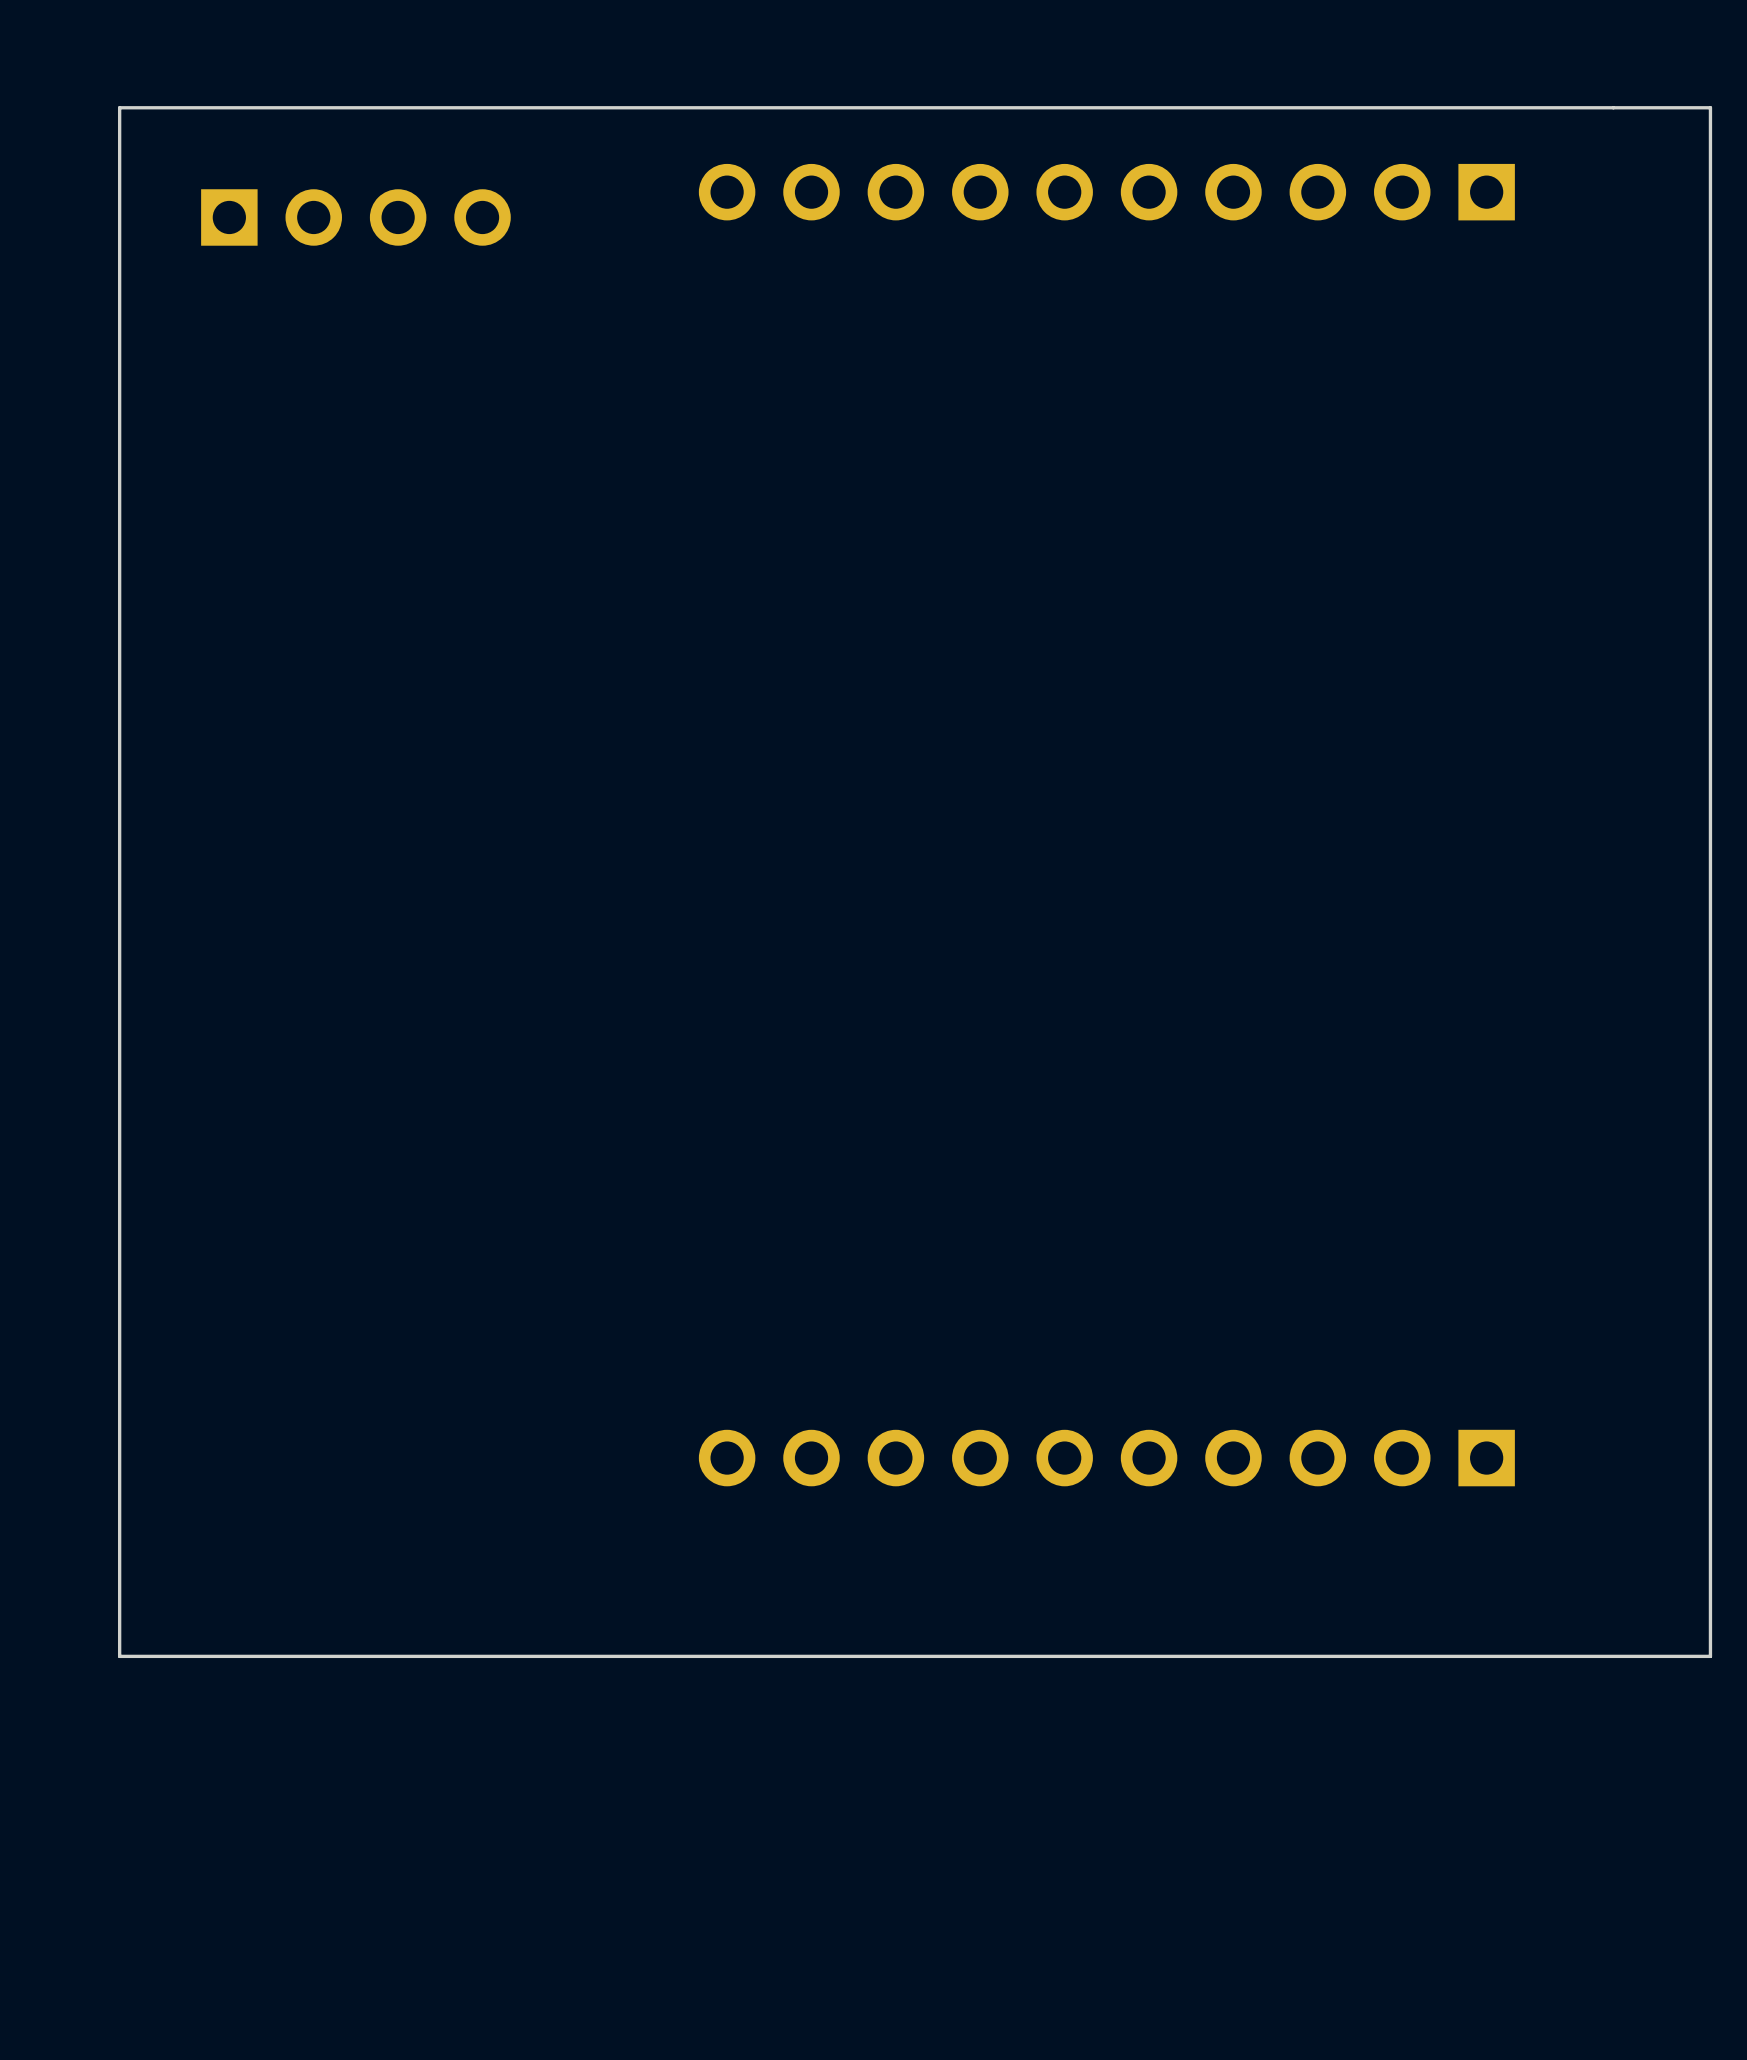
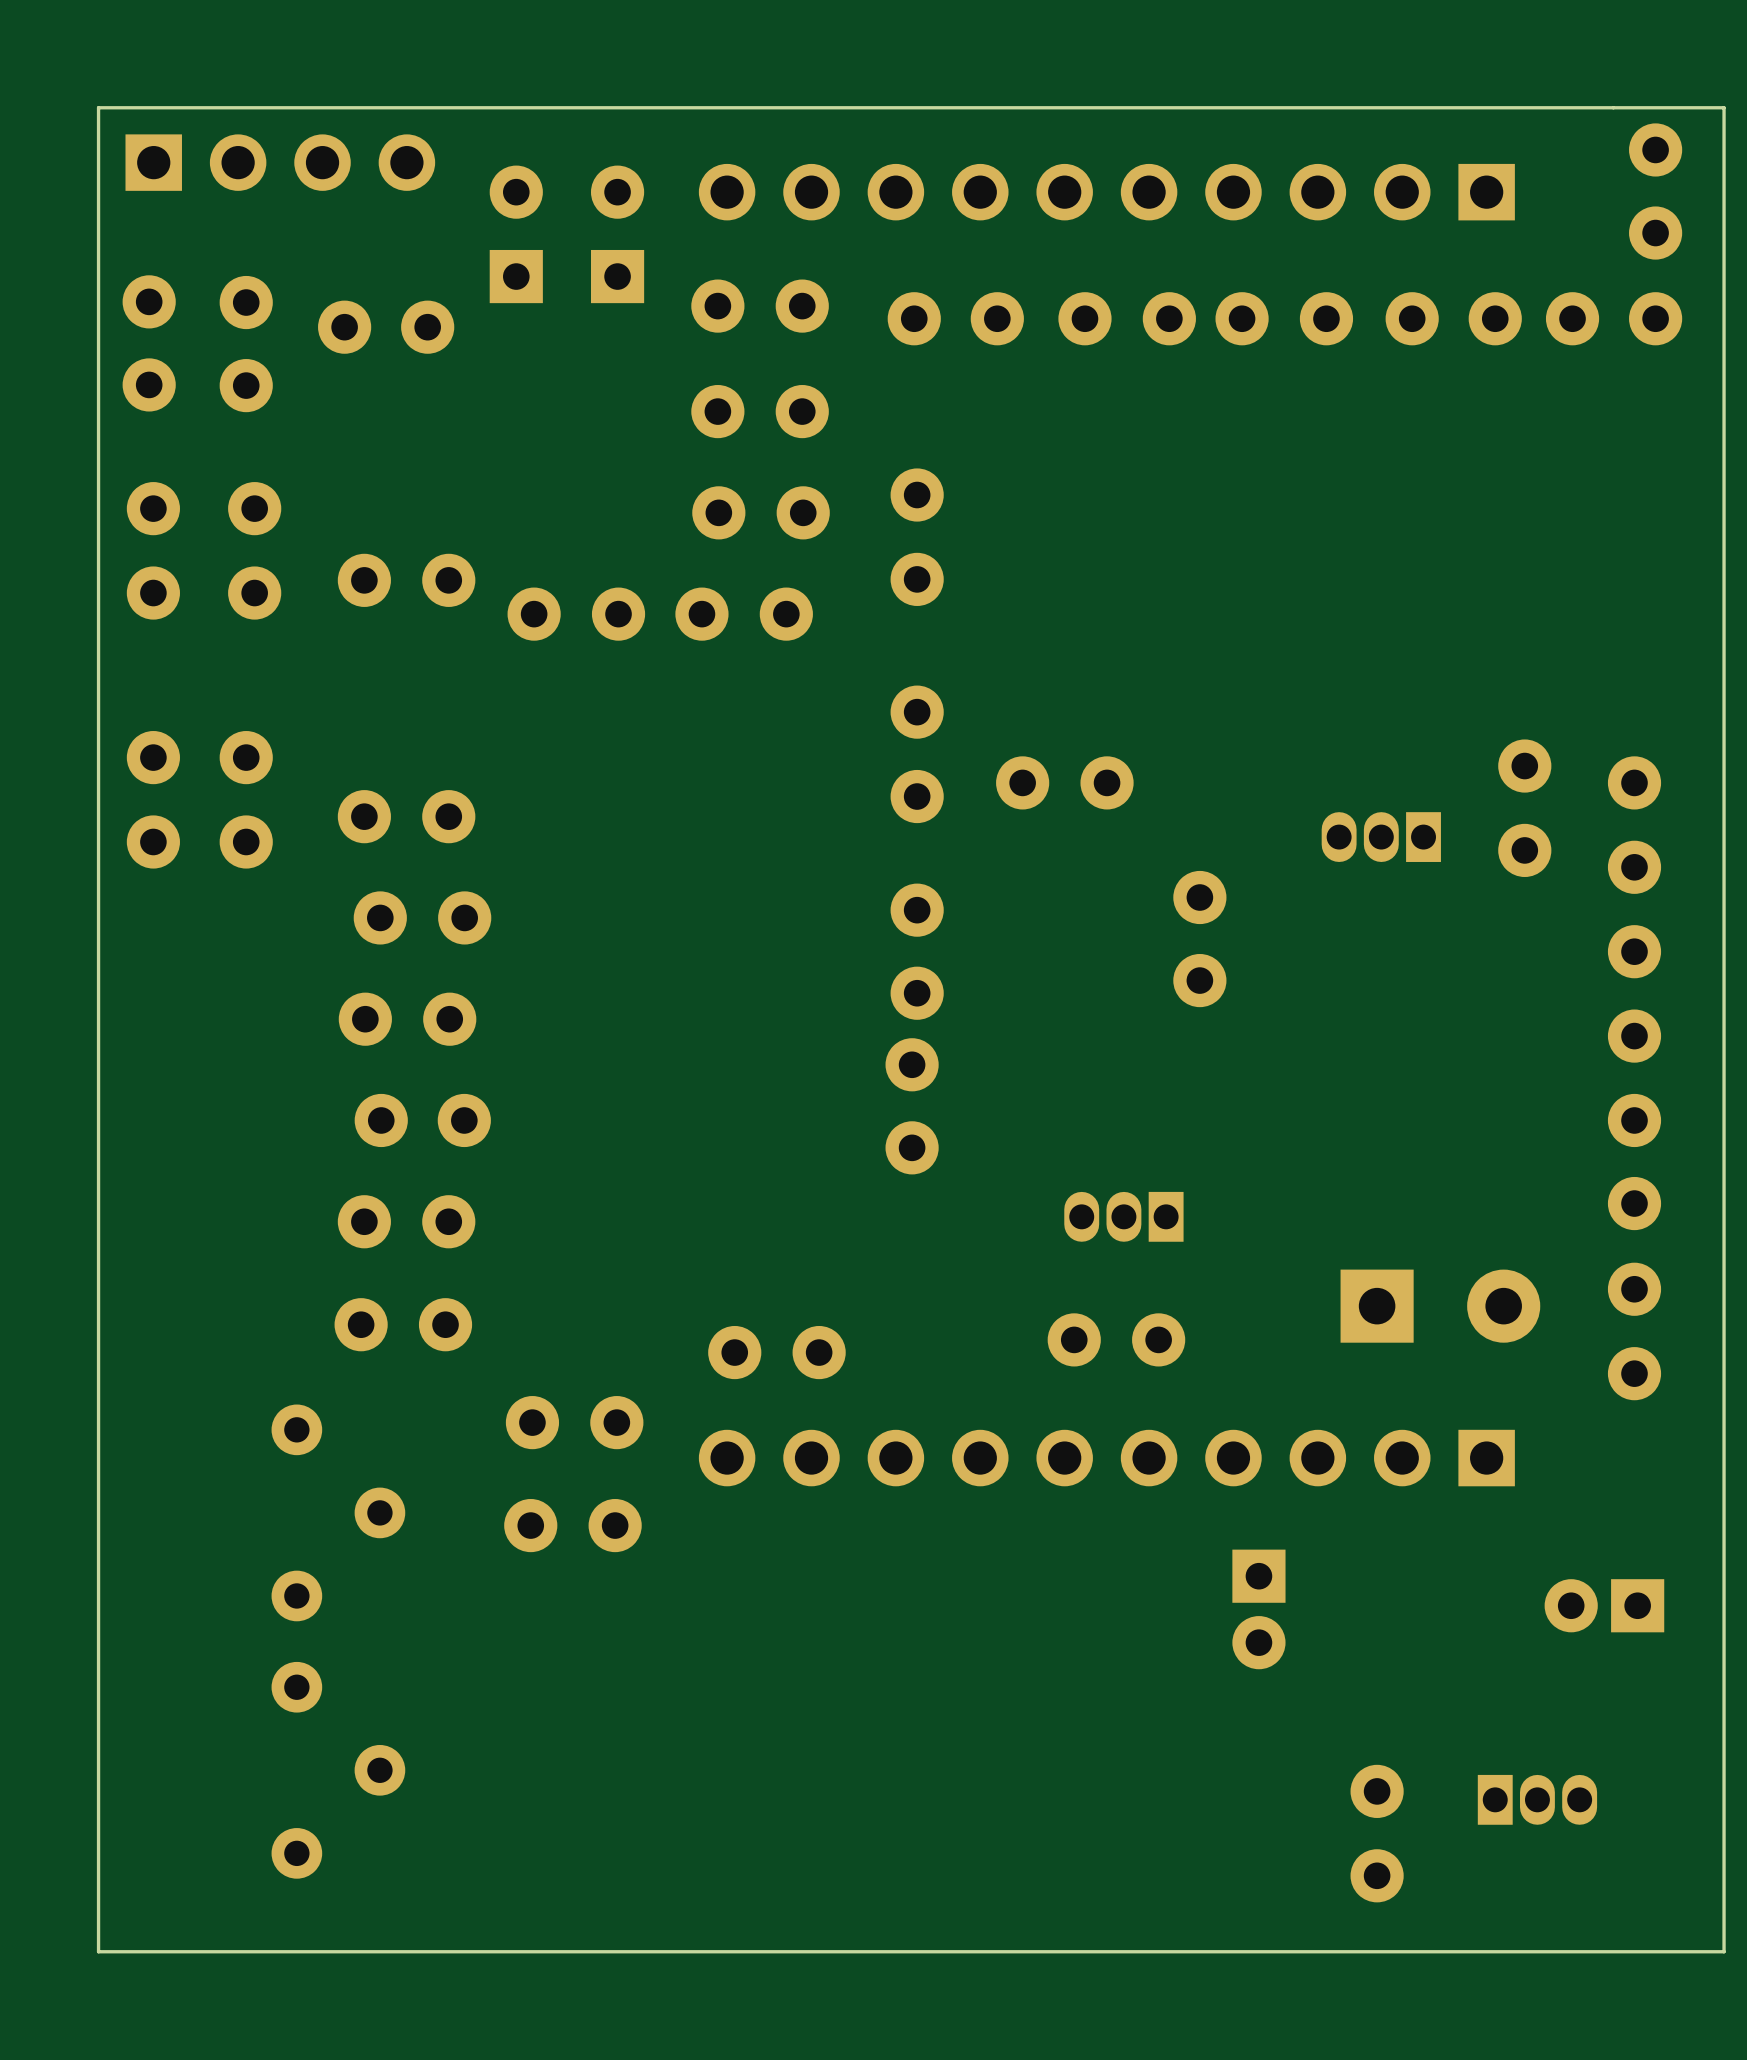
board edge: (1710, 107) (1710, 1656) (119, 1656) (119, 107) -> (1710, 107) (1724, 107) (1724, 1951) (98, 1951) (98, 107) (119, 107)
part: none -> (1655, 191)
part position: (355, 217) -> (280, 162)
part: none -> (516, 234)
part: none -> (617, 234)
part: none -> (760, 306)
part: none -> (955, 318)
part: none -> (1127, 318)
part: none -> (1284, 318)
part: none -> (1453, 318)
part: none -> (1614, 318)
part: none -> (386, 327)
part: none -> (149, 343)
part: none -> (246, 344)
part: none -> (760, 411)
part: none -> (761, 512)
part: none -> (917, 537)
part: none -> (153, 550)
part: none -> (254, 550)
part: none -> (406, 580)
part: none -> (576, 614)
part: none -> (744, 614)
part: none -> (917, 754)
part: none -> (1064, 782)
part: none -> (153, 799)
part: none -> (246, 799)
part: none -> (1524, 808)
part: none -> (406, 816)
part: none -> (1634, 825)
part: none -> (1381, 837)
part: none -> (422, 917)
part: none -> (1199, 939)
part: none -> (917, 951)
part: none -> (1634, 993)
part: none -> (407, 1019)
part: none -> (912, 1106)
part: none -> (422, 1120)
part: none -> (1634, 1162)
part: none -> (1123, 1216)
part: none -> (406, 1221)
part: none -> (1440, 1306)
part: none -> (403, 1324)
part: none -> (1634, 1331)
part: none -> (1116, 1339)
part: none -> (776, 1352)
part: none -> (574, 1422)
part: none -> (338, 1512)
part: none -> (572, 1525)
part: none -> (1604, 1605)
part: none -> (1258, 1609)
part: none -> (338, 1770)
part: none -> (1537, 1799)
part: none -> (1377, 1833)

